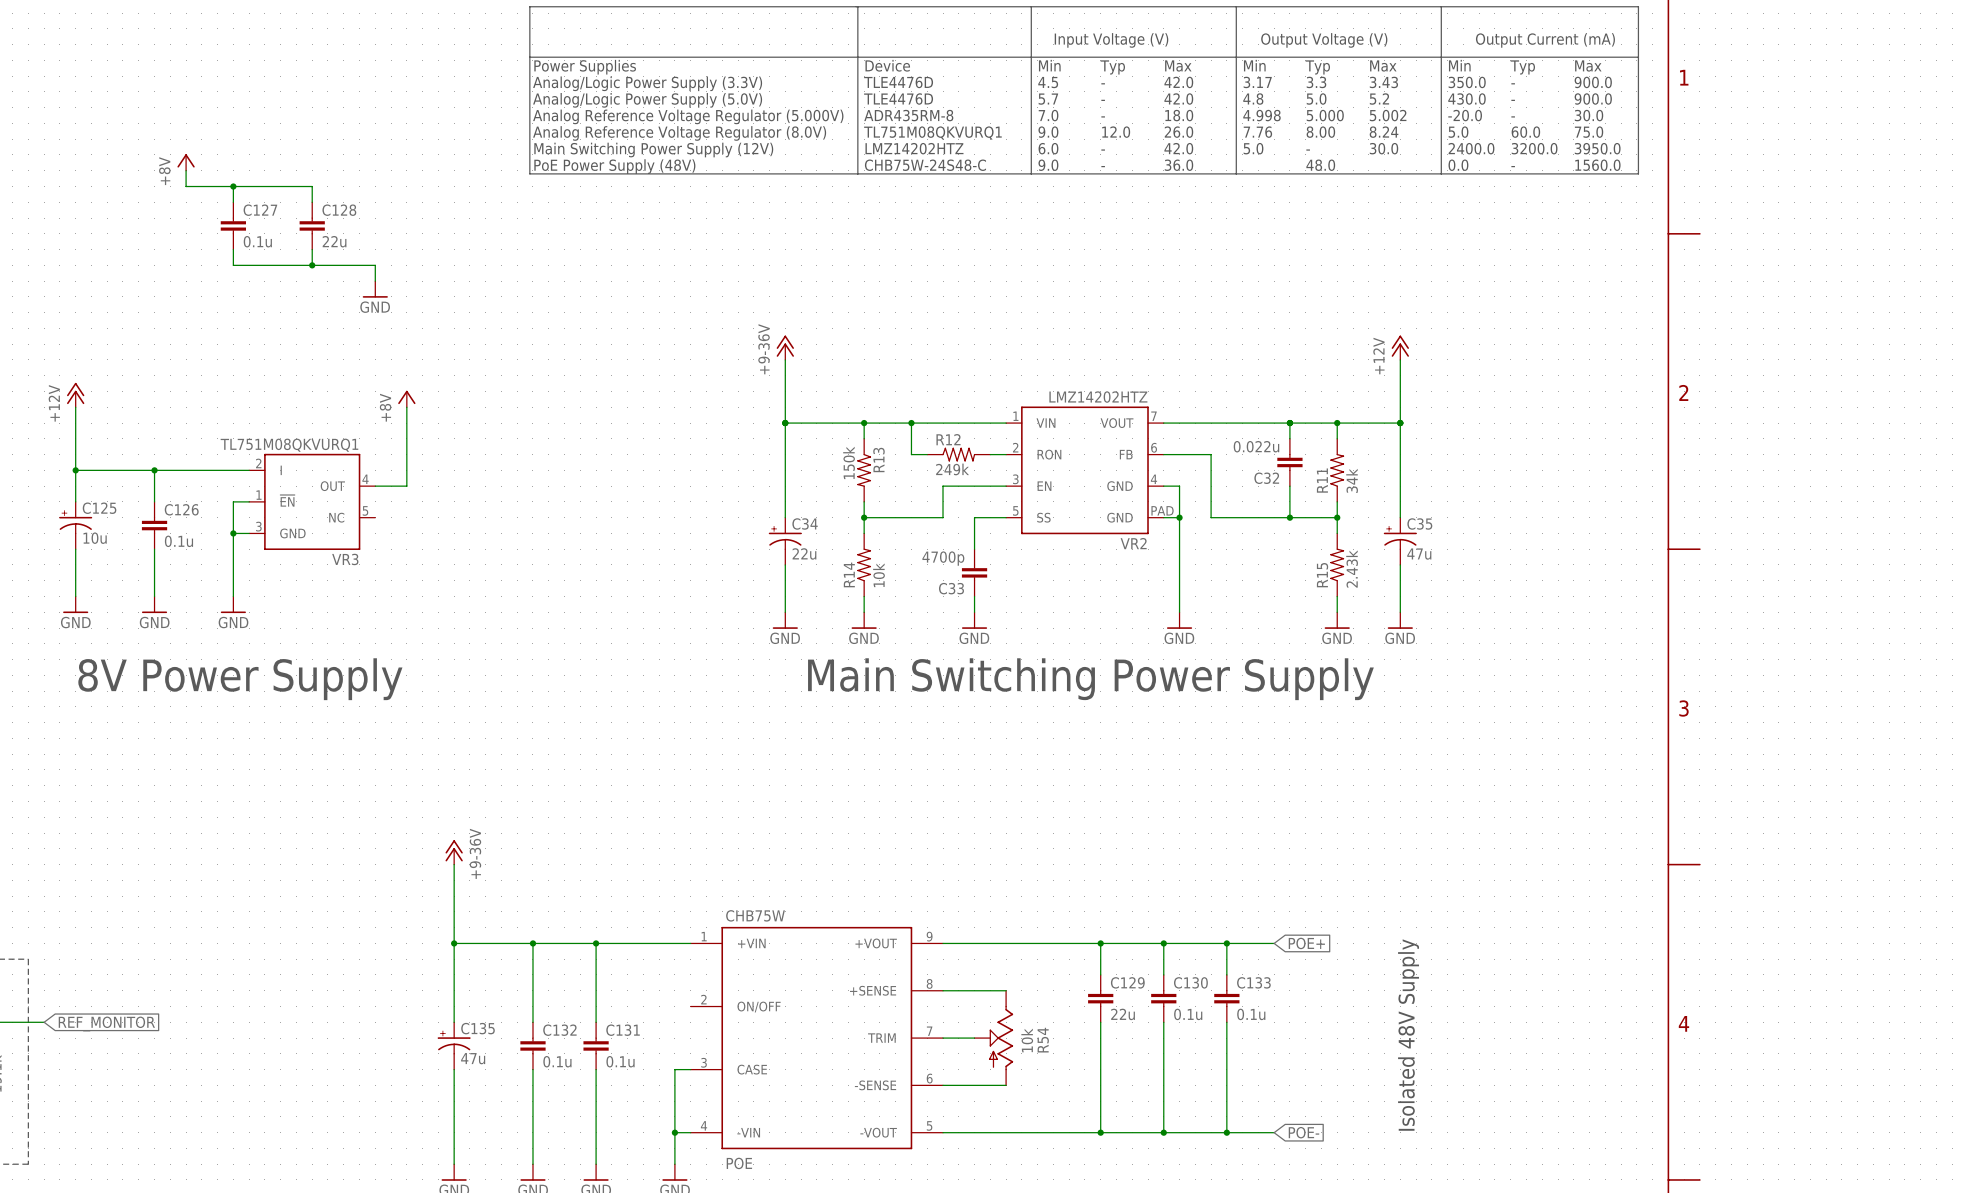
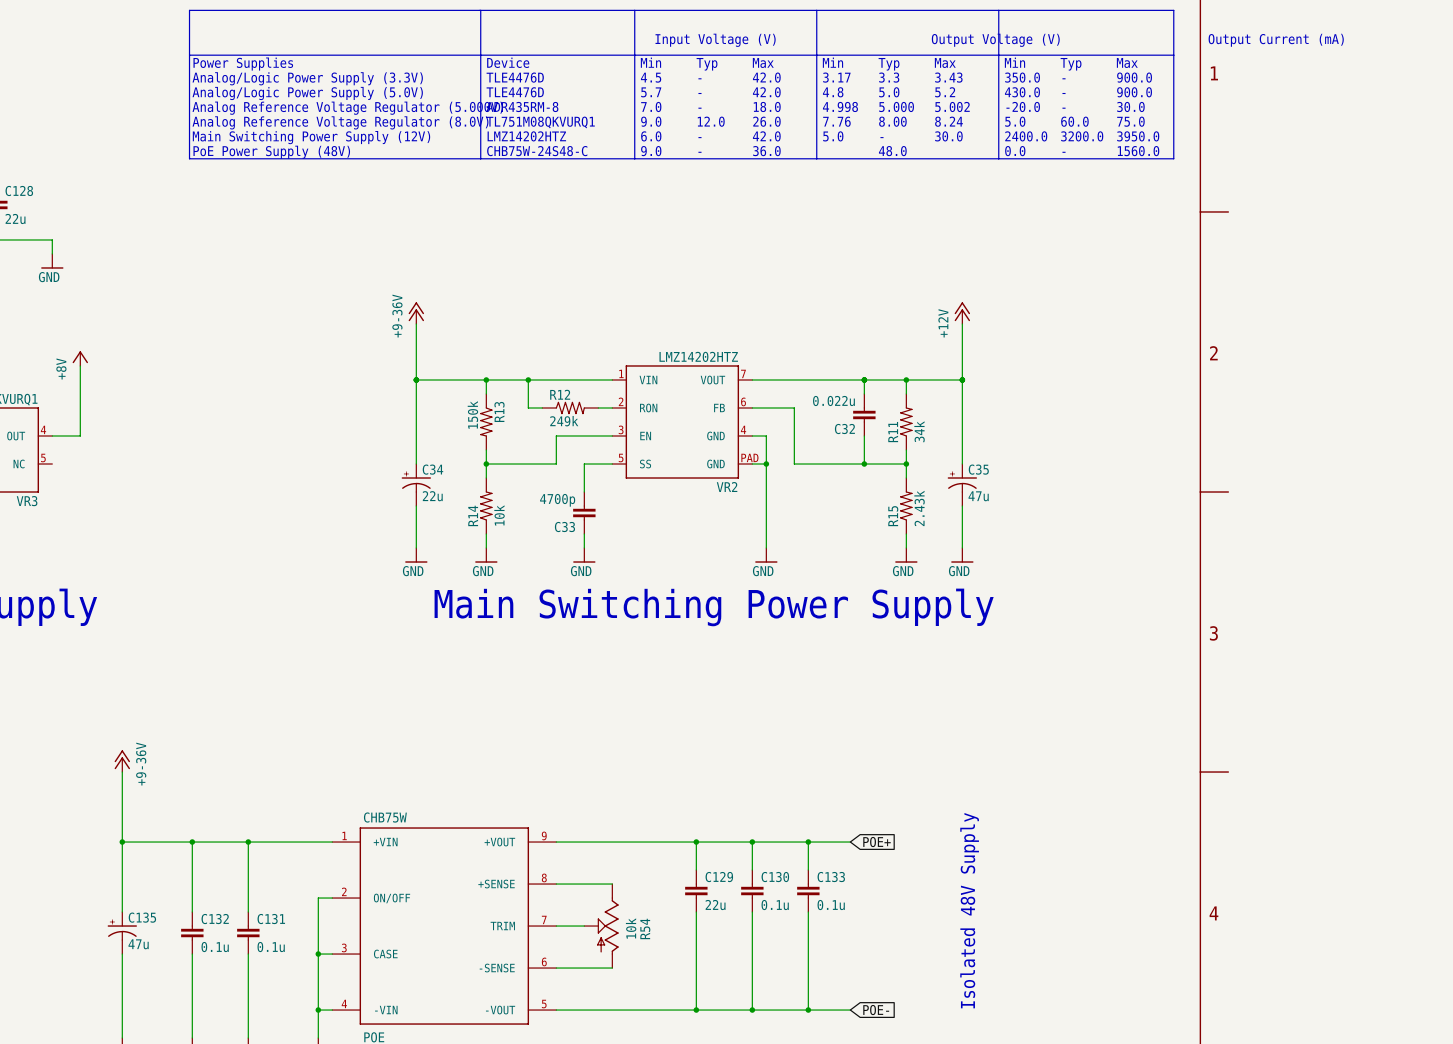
wire: none -> (332, 898) (318, 898) (318, 954)
junction: none -> (318, 954)

